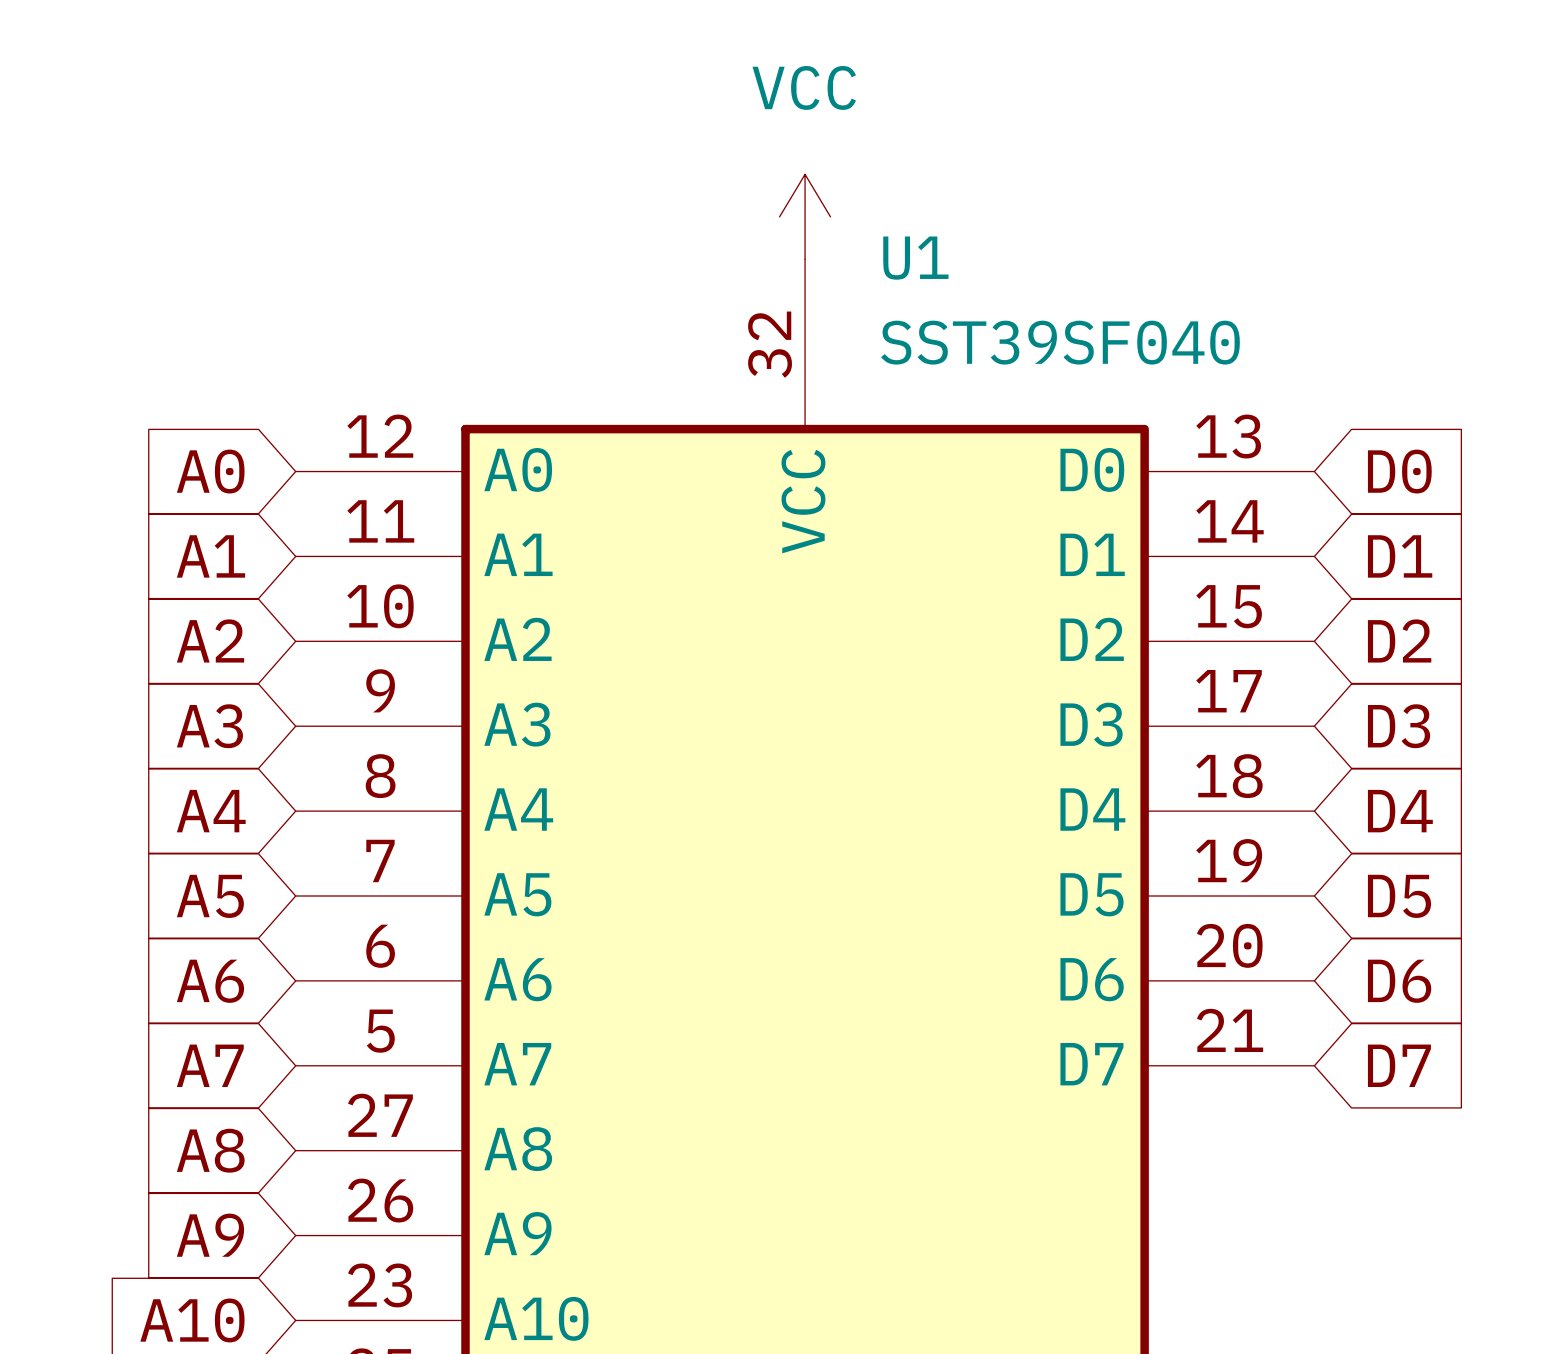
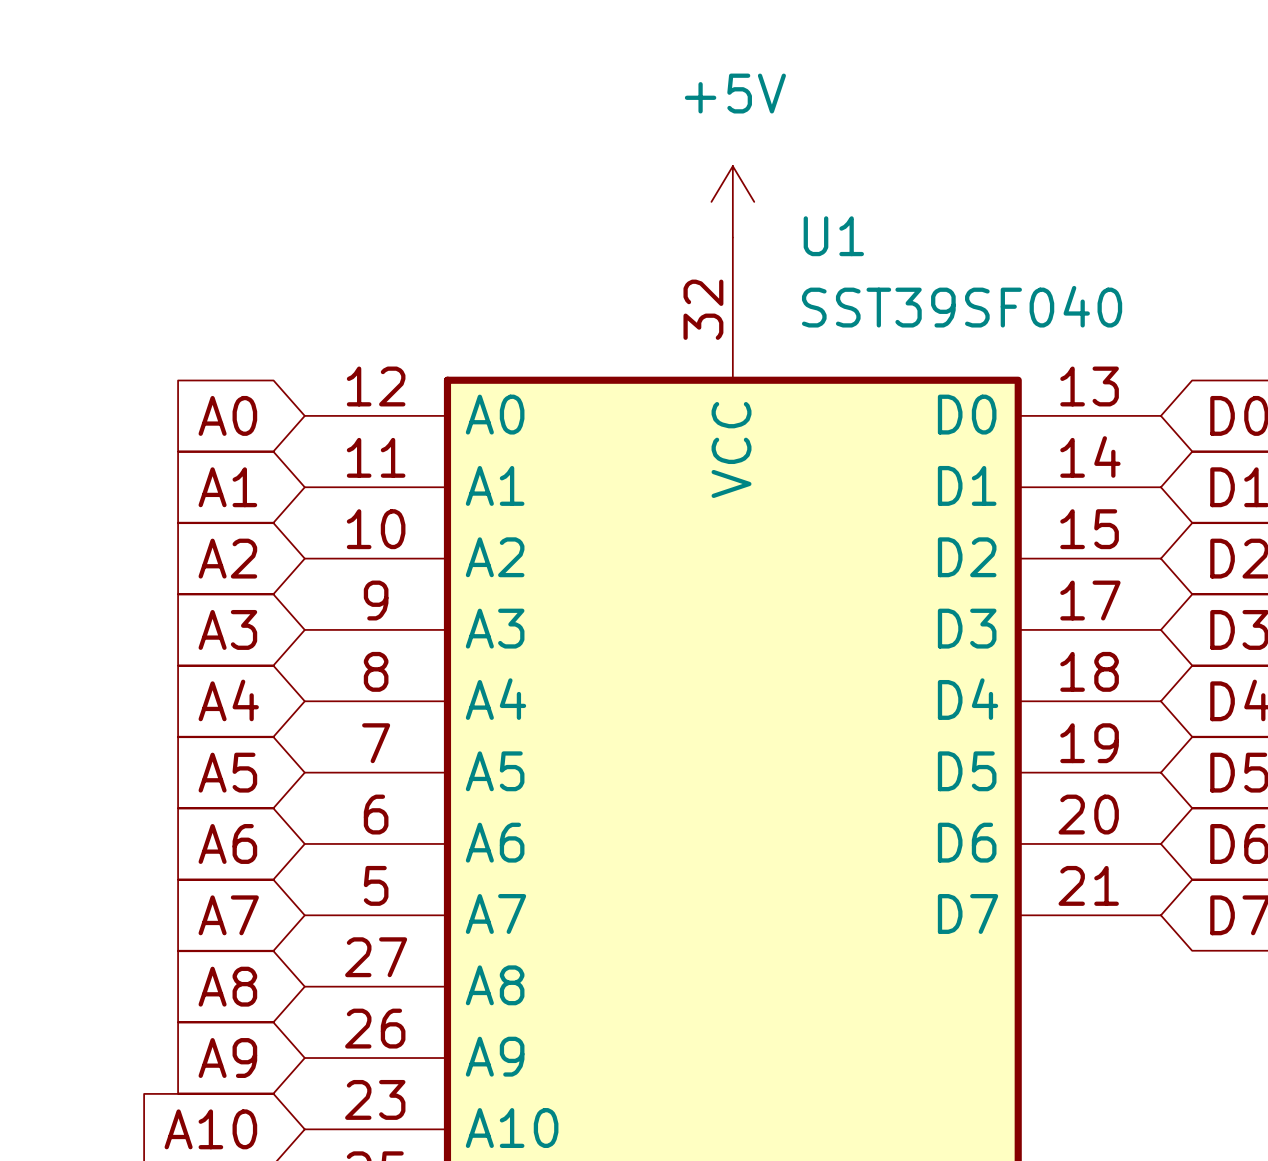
power symbol: VCC (805, 216) -> +5V (732, 201)

